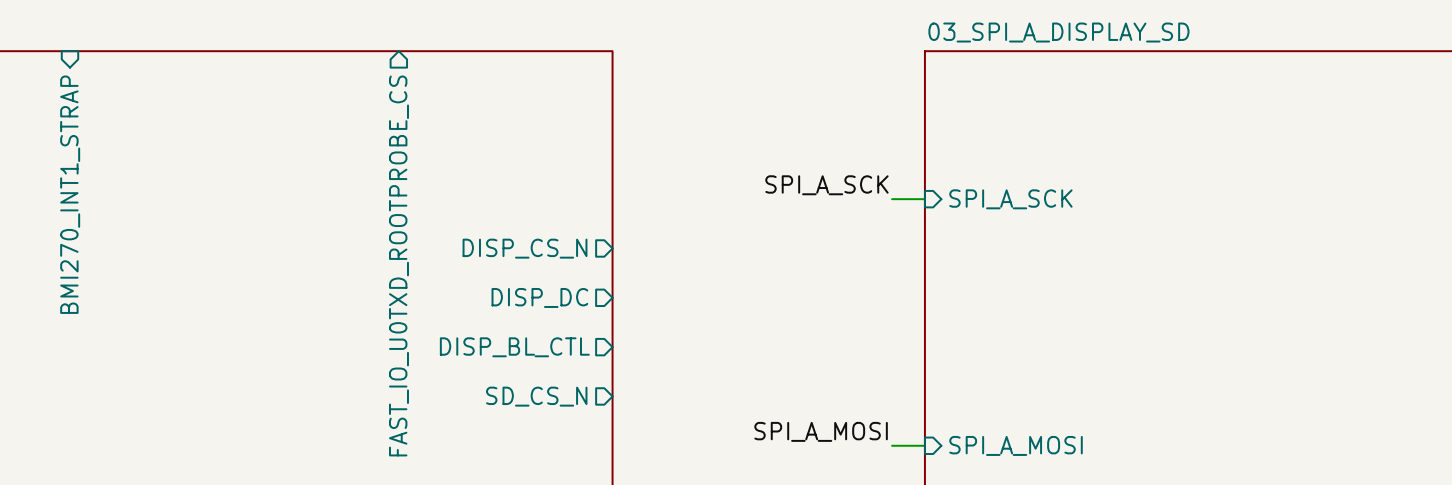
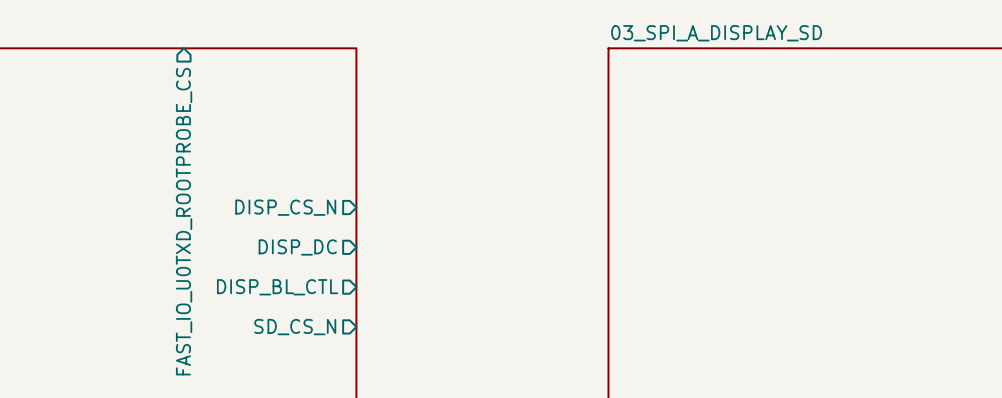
label: SPI_A_SCK (826, 185) -> none
wire: (892, 199) (924, 199) -> none
sheet pin: SPI_A_SCK (1010, 199) -> none
label: SPI_A_MOSI (821, 431) -> none
wire: (892, 445) (924, 445) -> none
sheet pin: SPI_A_MOSI (1016, 445) -> none

